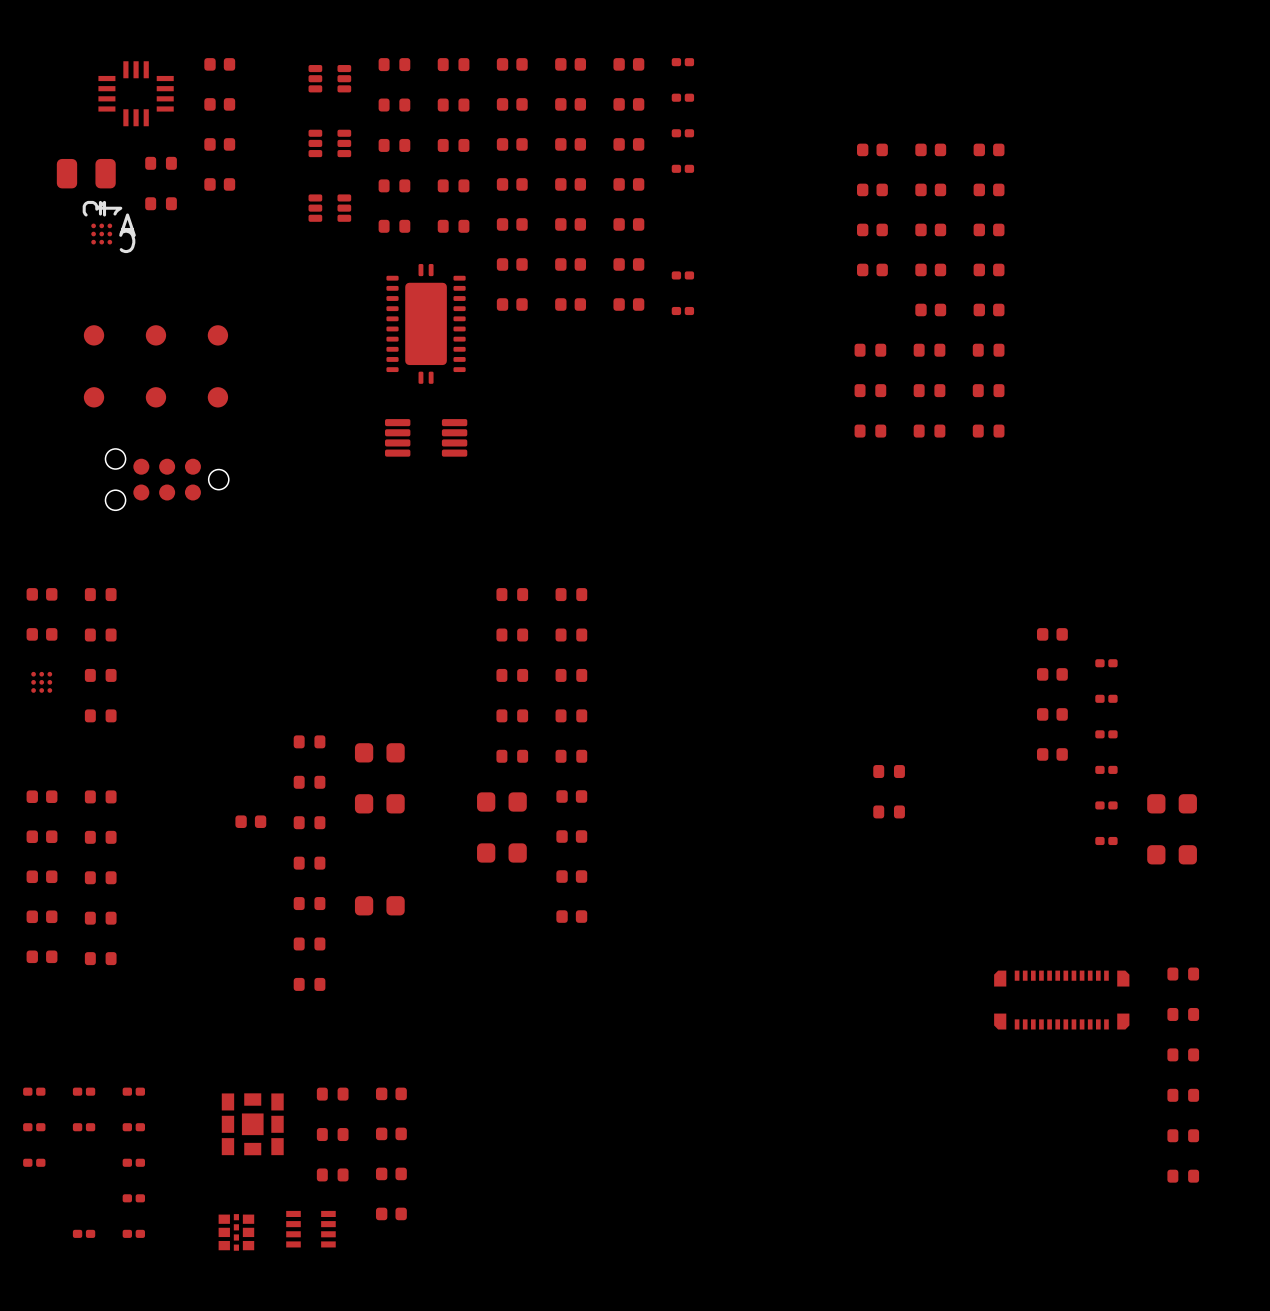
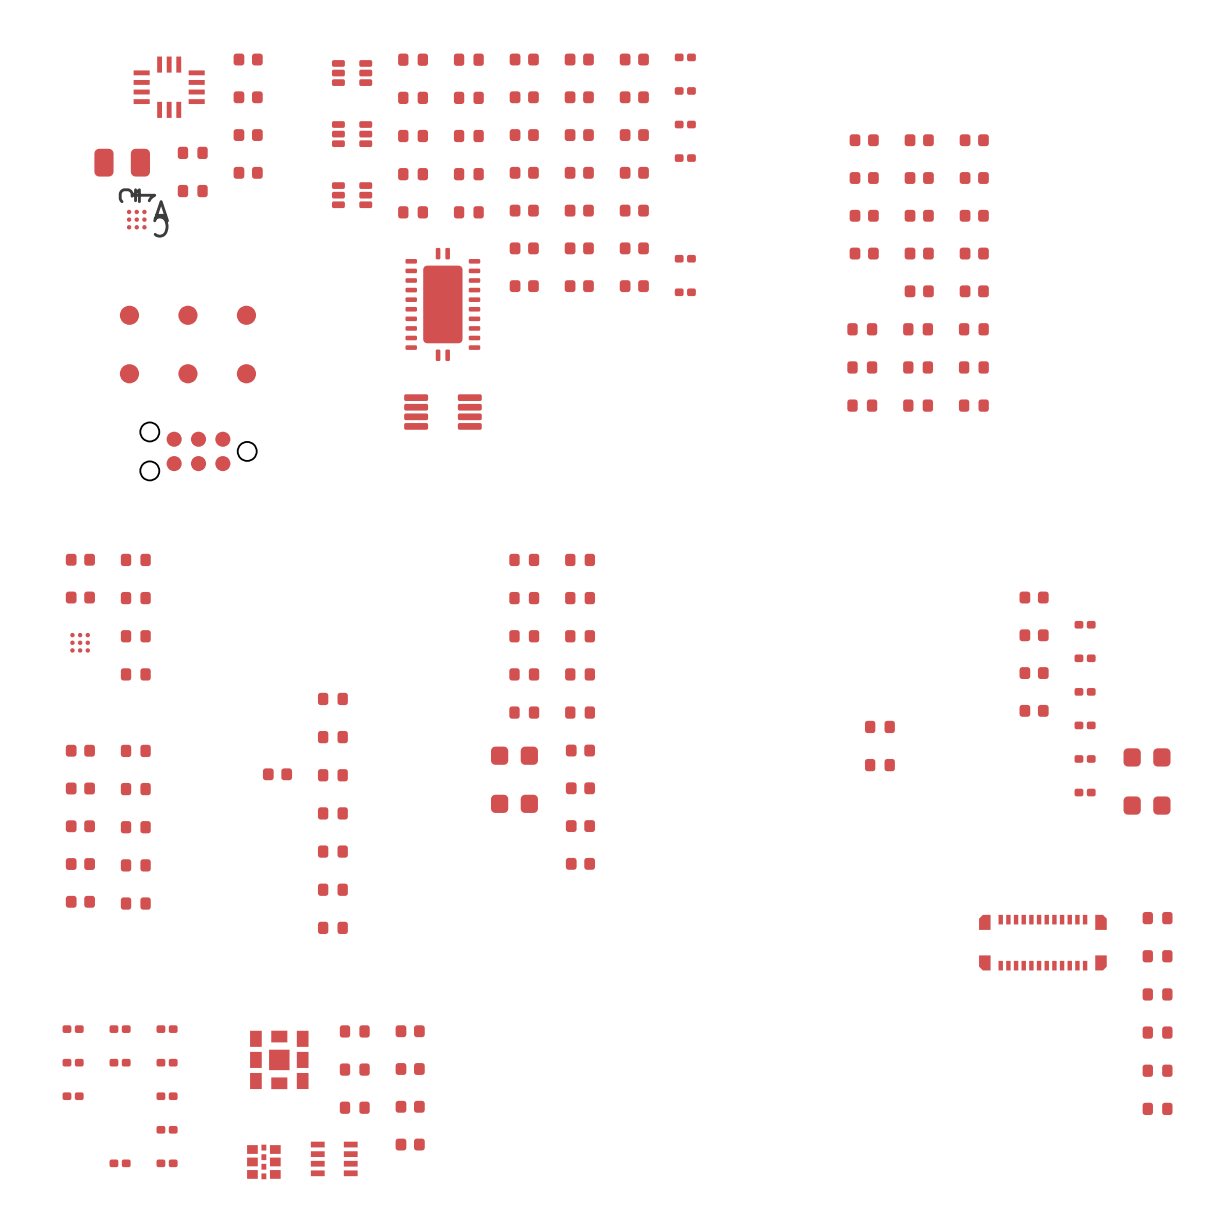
part: (379, 752) -> none
part: (379, 803) -> none
part: (379, 905) -> none

